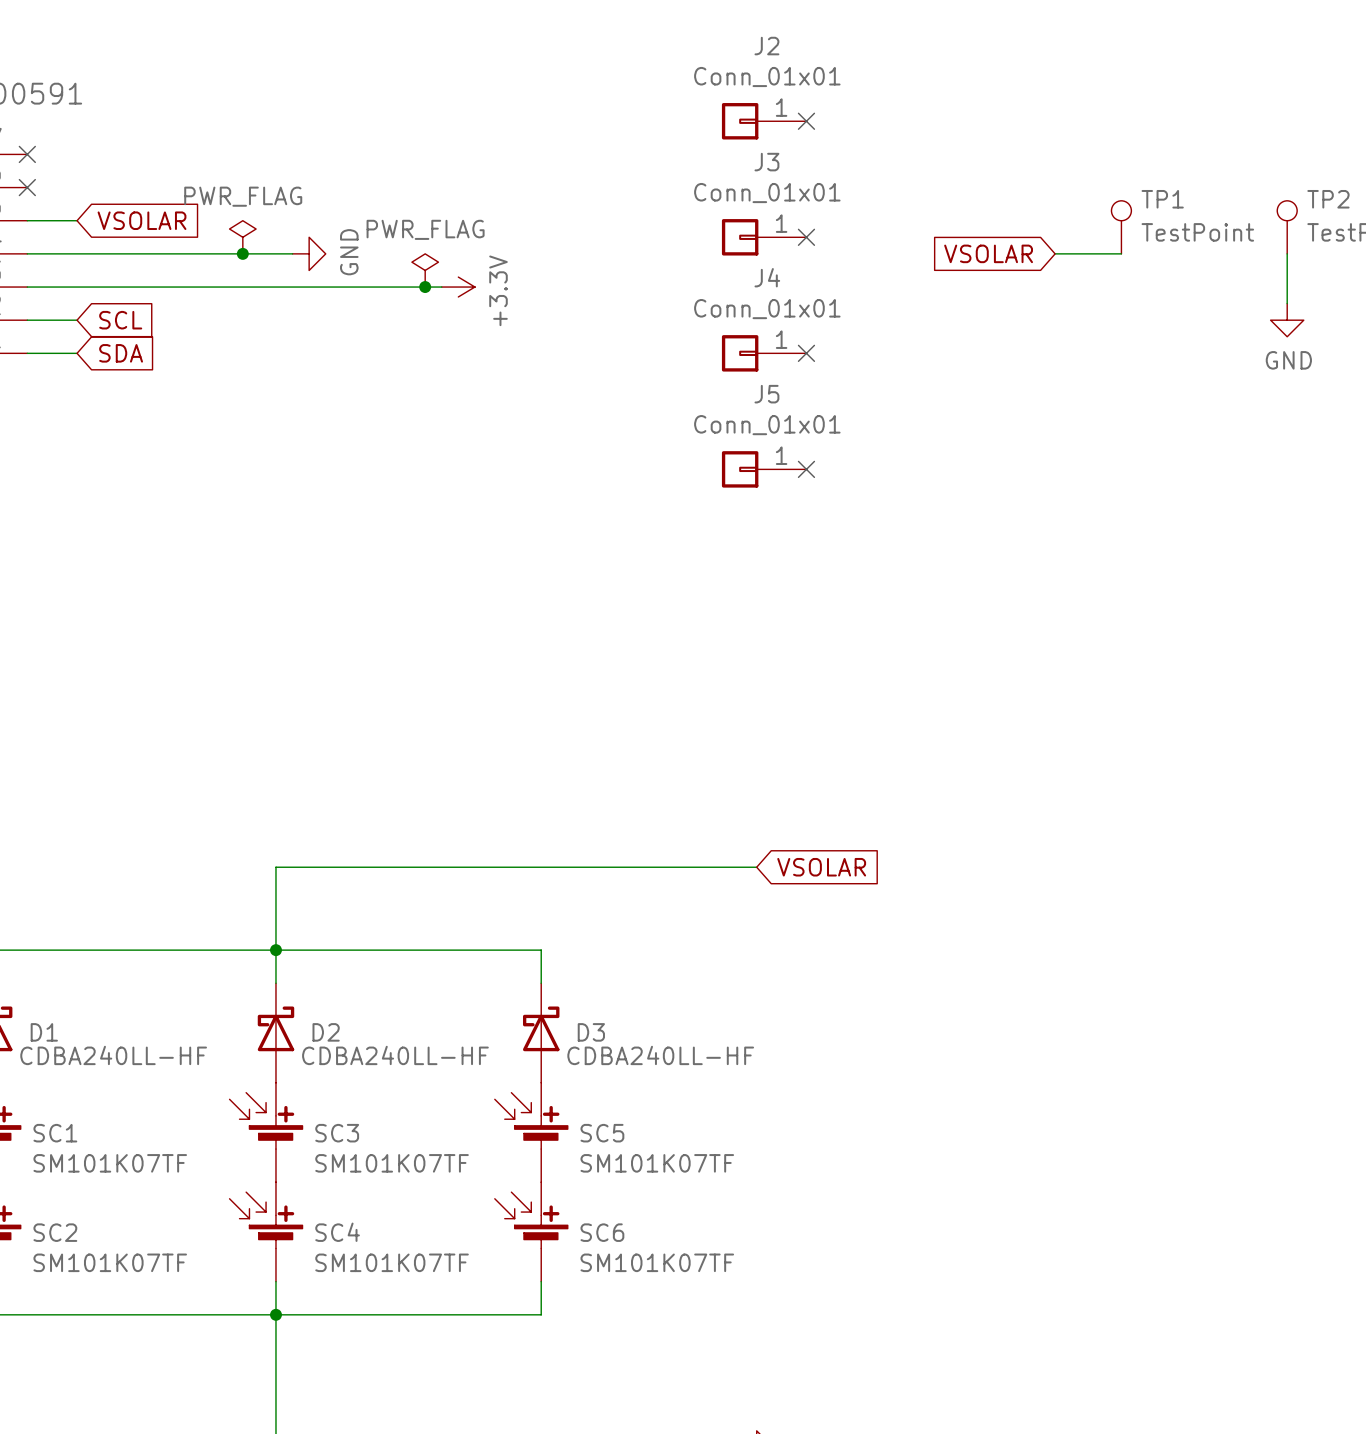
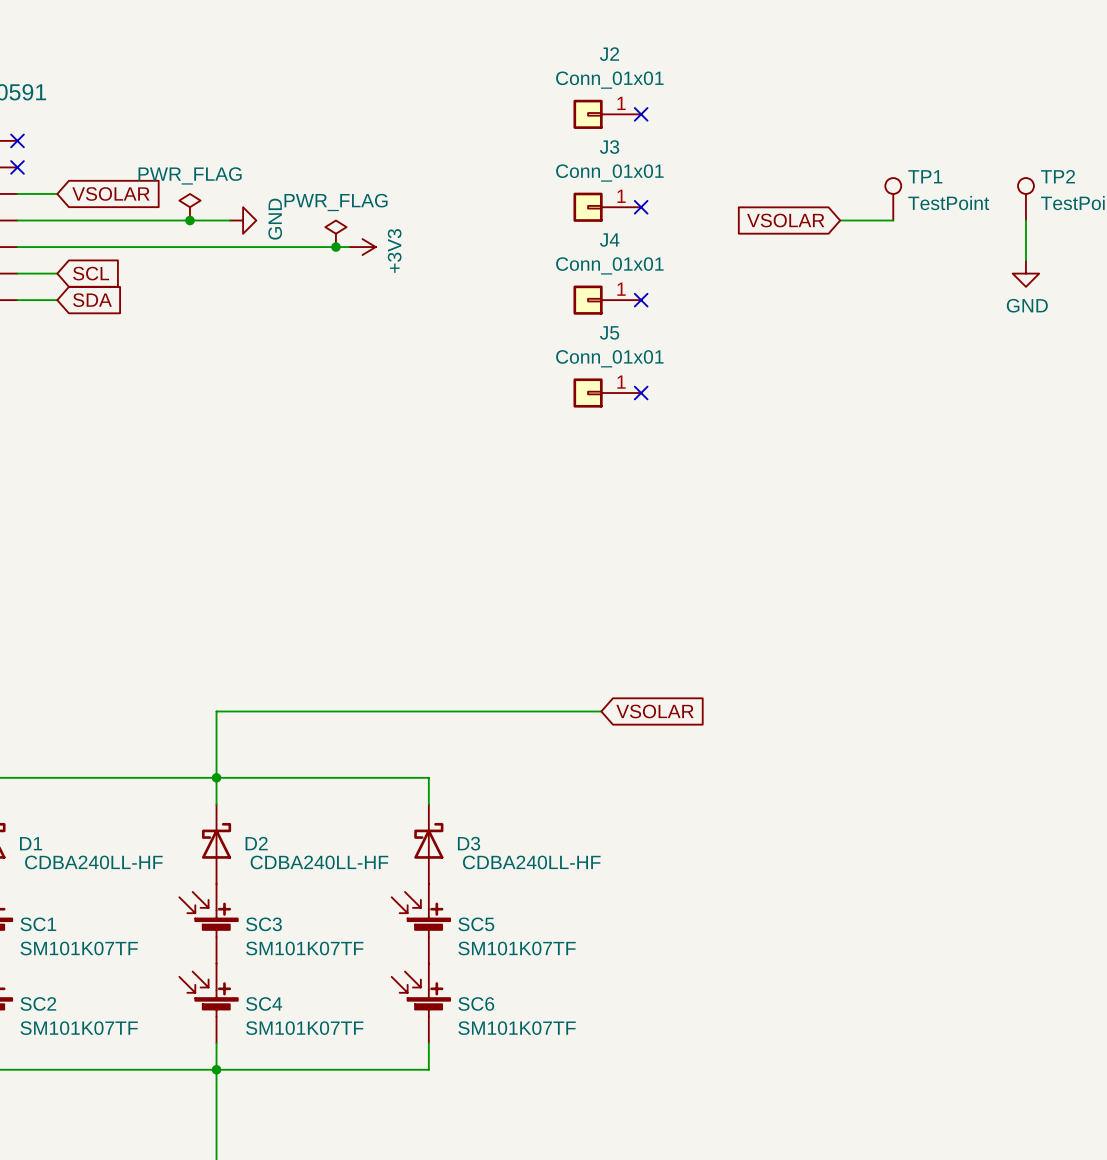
power symbol: +3.3V (458, 287) -> +3V3 (362, 247)

